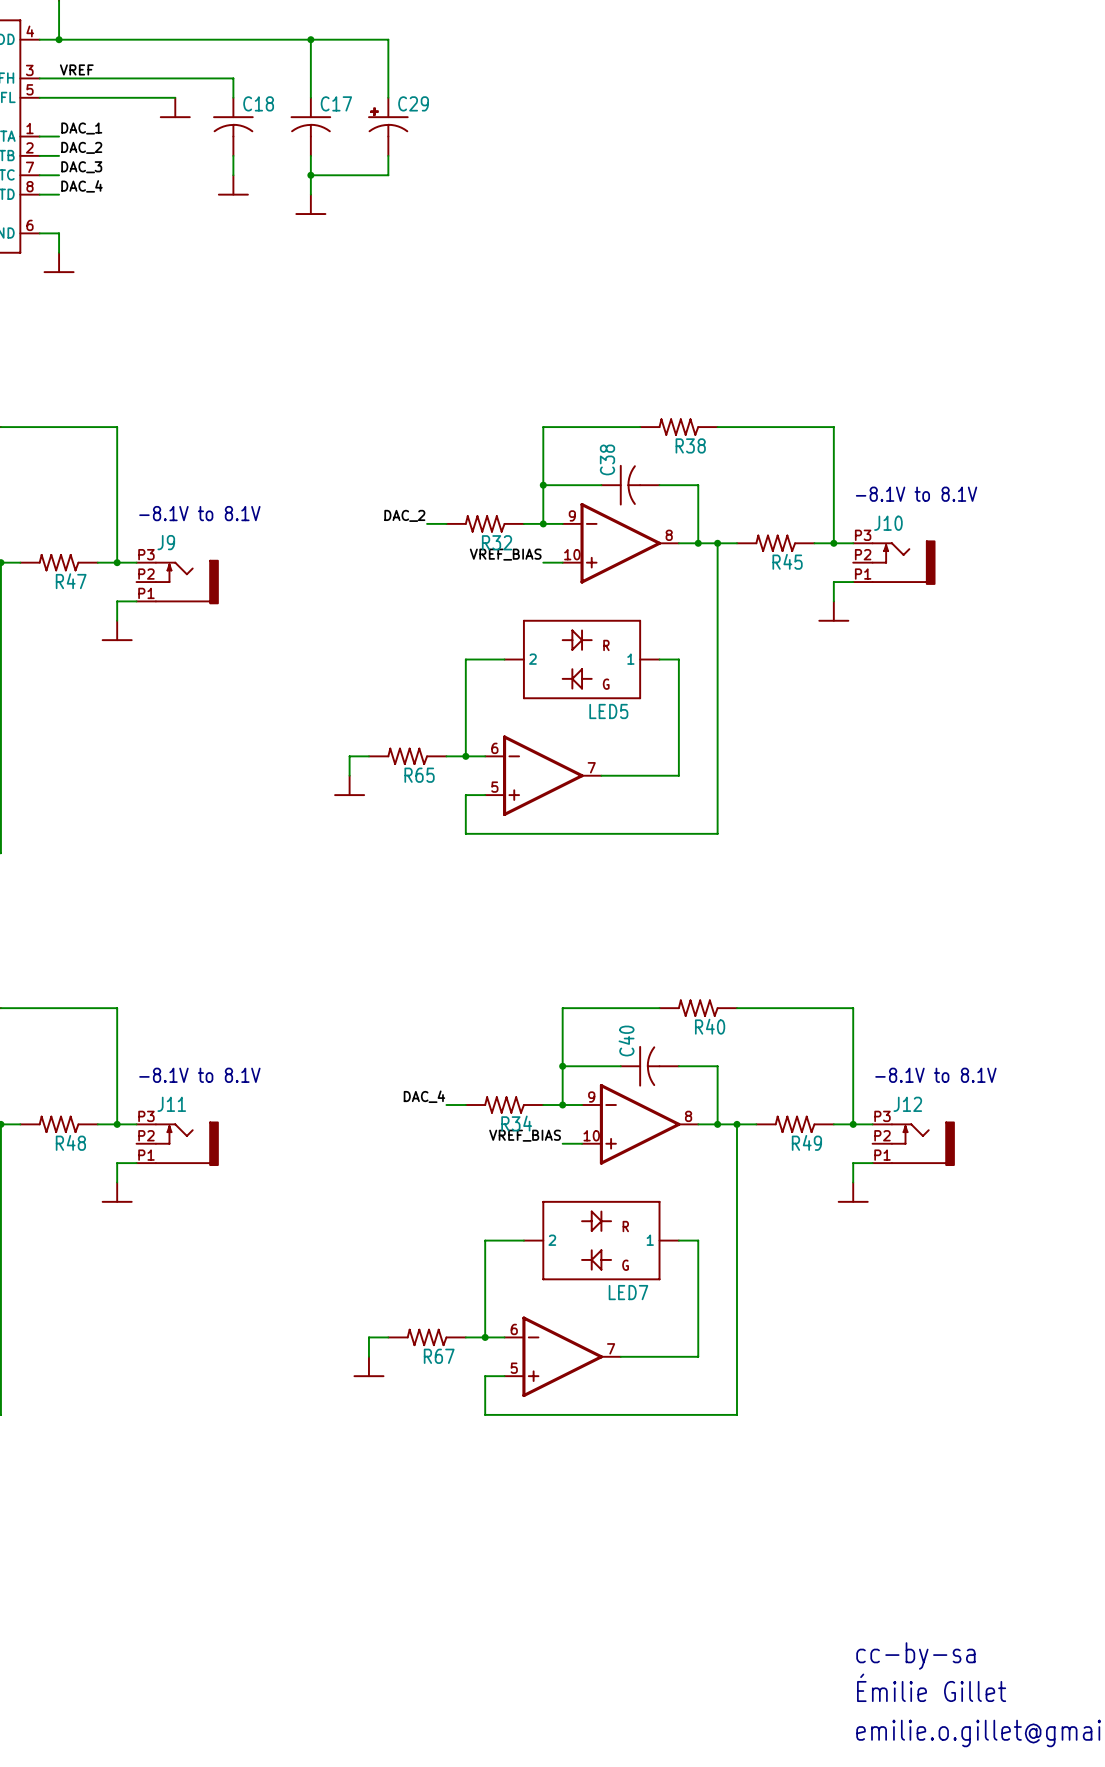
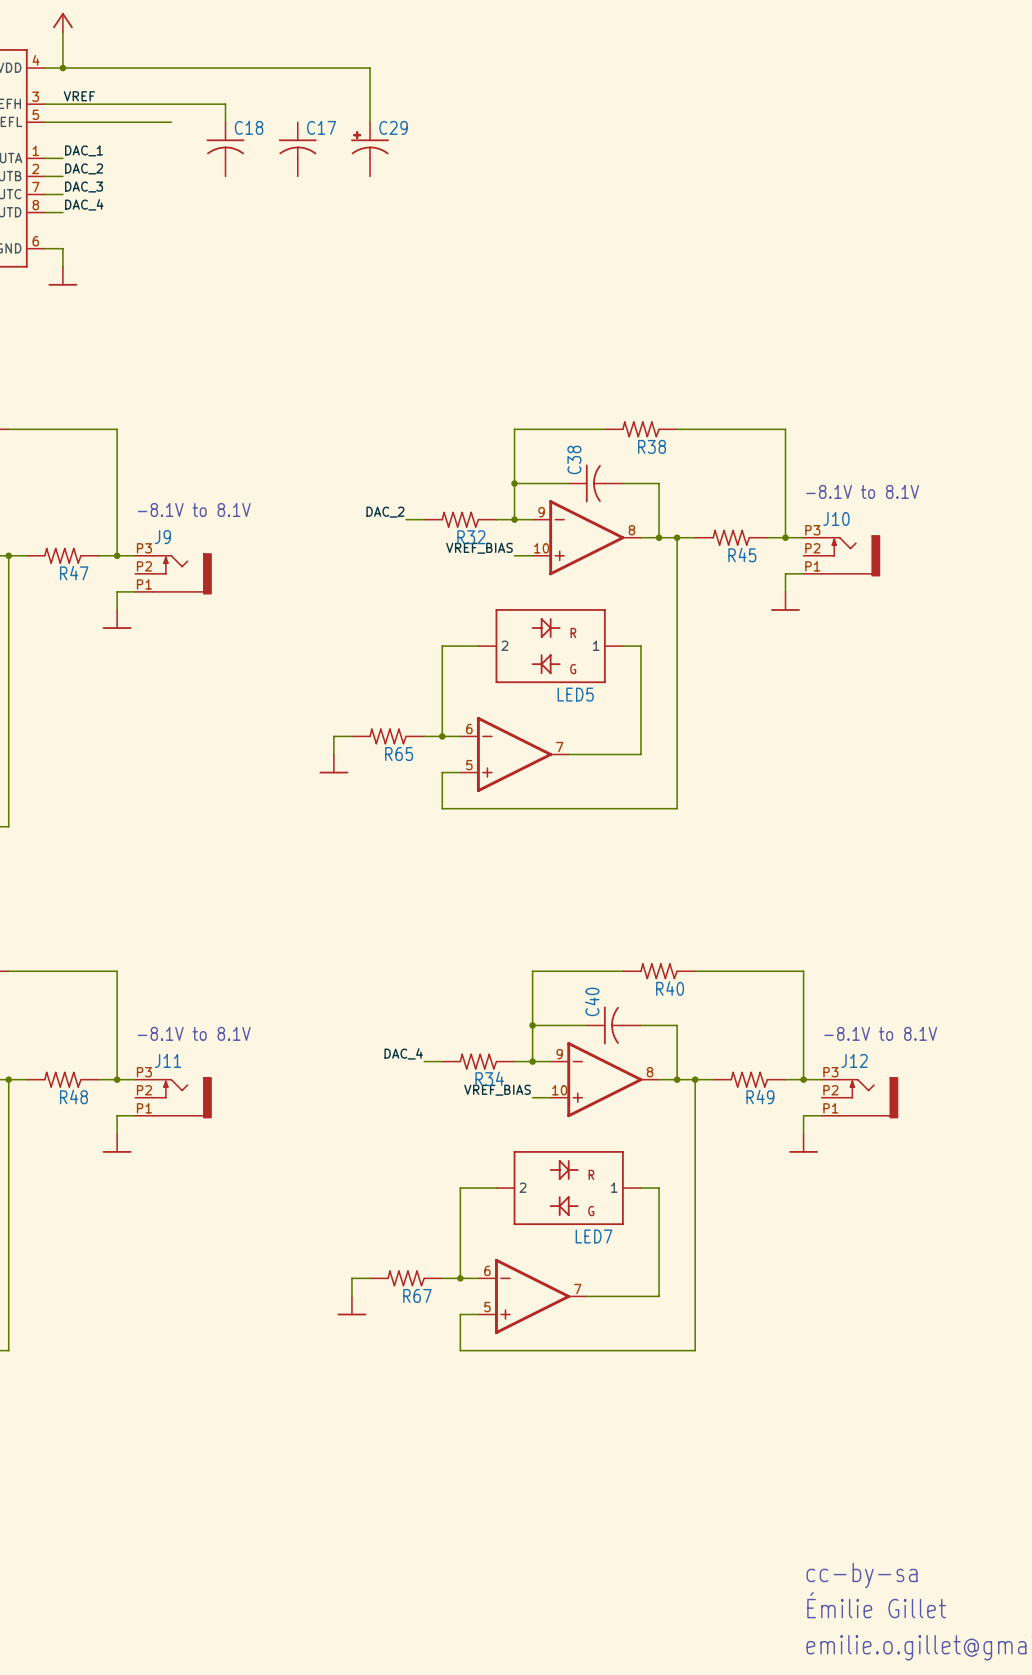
wire: (310, 39) (310, 97) -> none
junction: (310, 39) -> none
power symbol: (175, 107) -> none
wire: (233, 155) (233, 175) -> none
wire: (310, 155) (310, 194) -> none
wire: (388, 155) (388, 175) (310, 175) -> none
junction: (310, 175) -> none
power symbol: (233, 185) -> none
power symbol: (310, 204) -> none

